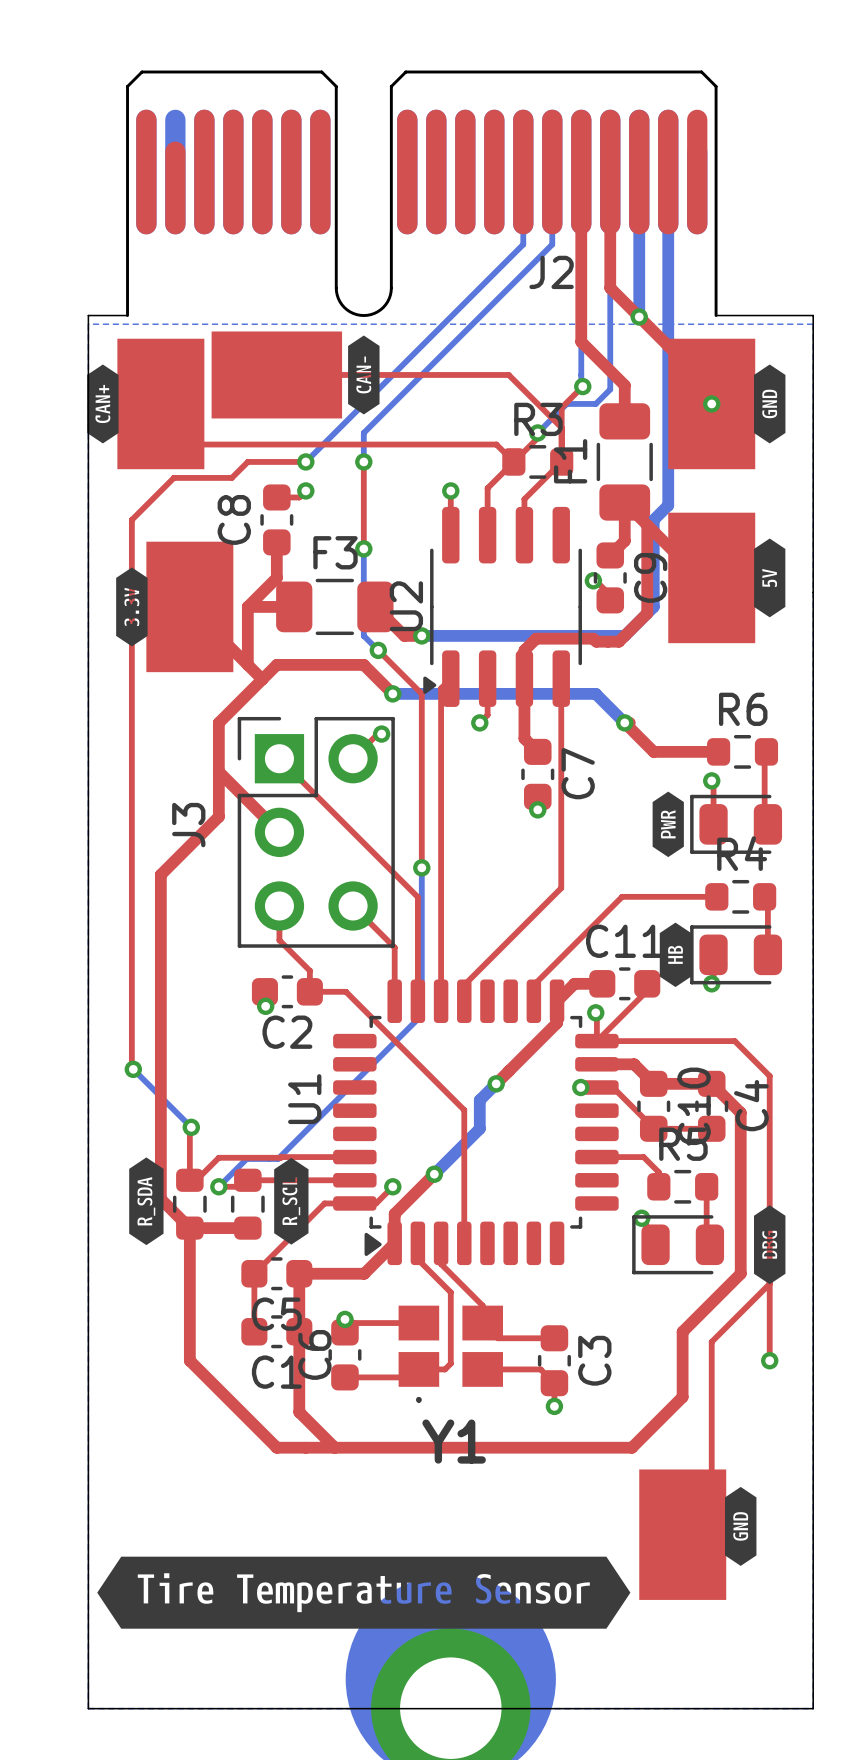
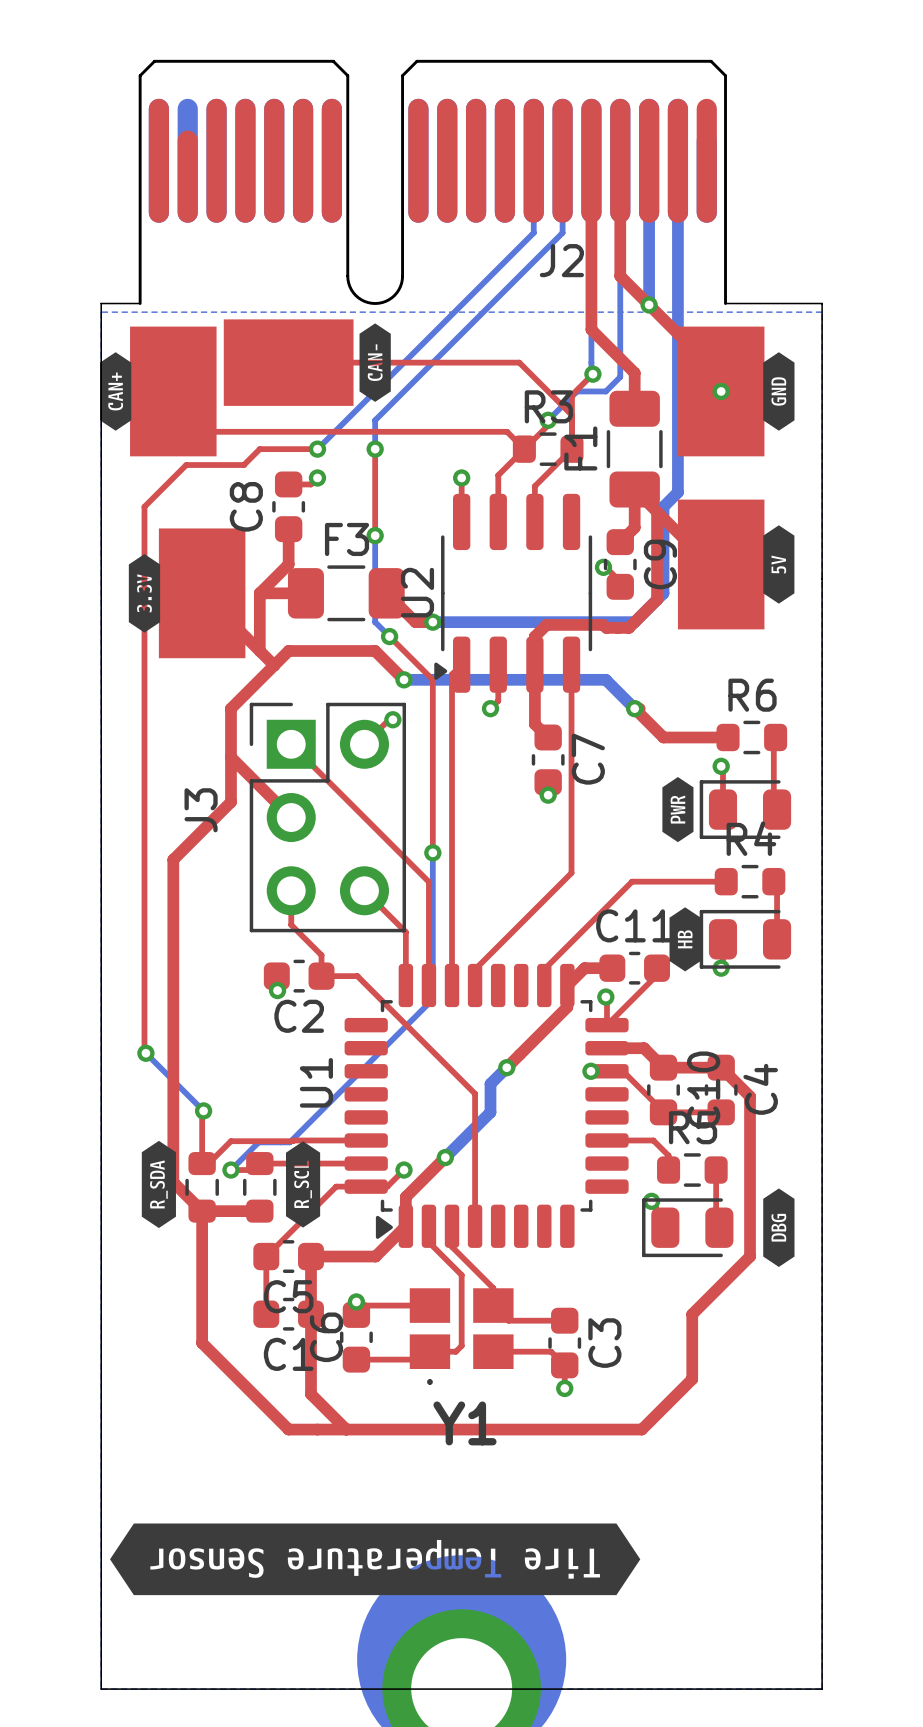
top track: (596, 1041) (734, 1041) (769, 1076) (769, 1360) -> none
top track: (769, 1283) (711, 1341) (711, 1505) (682, 1534) -> none
via: (769, 1360) -> none
drawing: [725, 1486, 757, 1566] -> none
part: (682, 1534) -> none
drawing shape: [97, 1556, 631, 1629] -> [110, 1523, 641, 1596]

